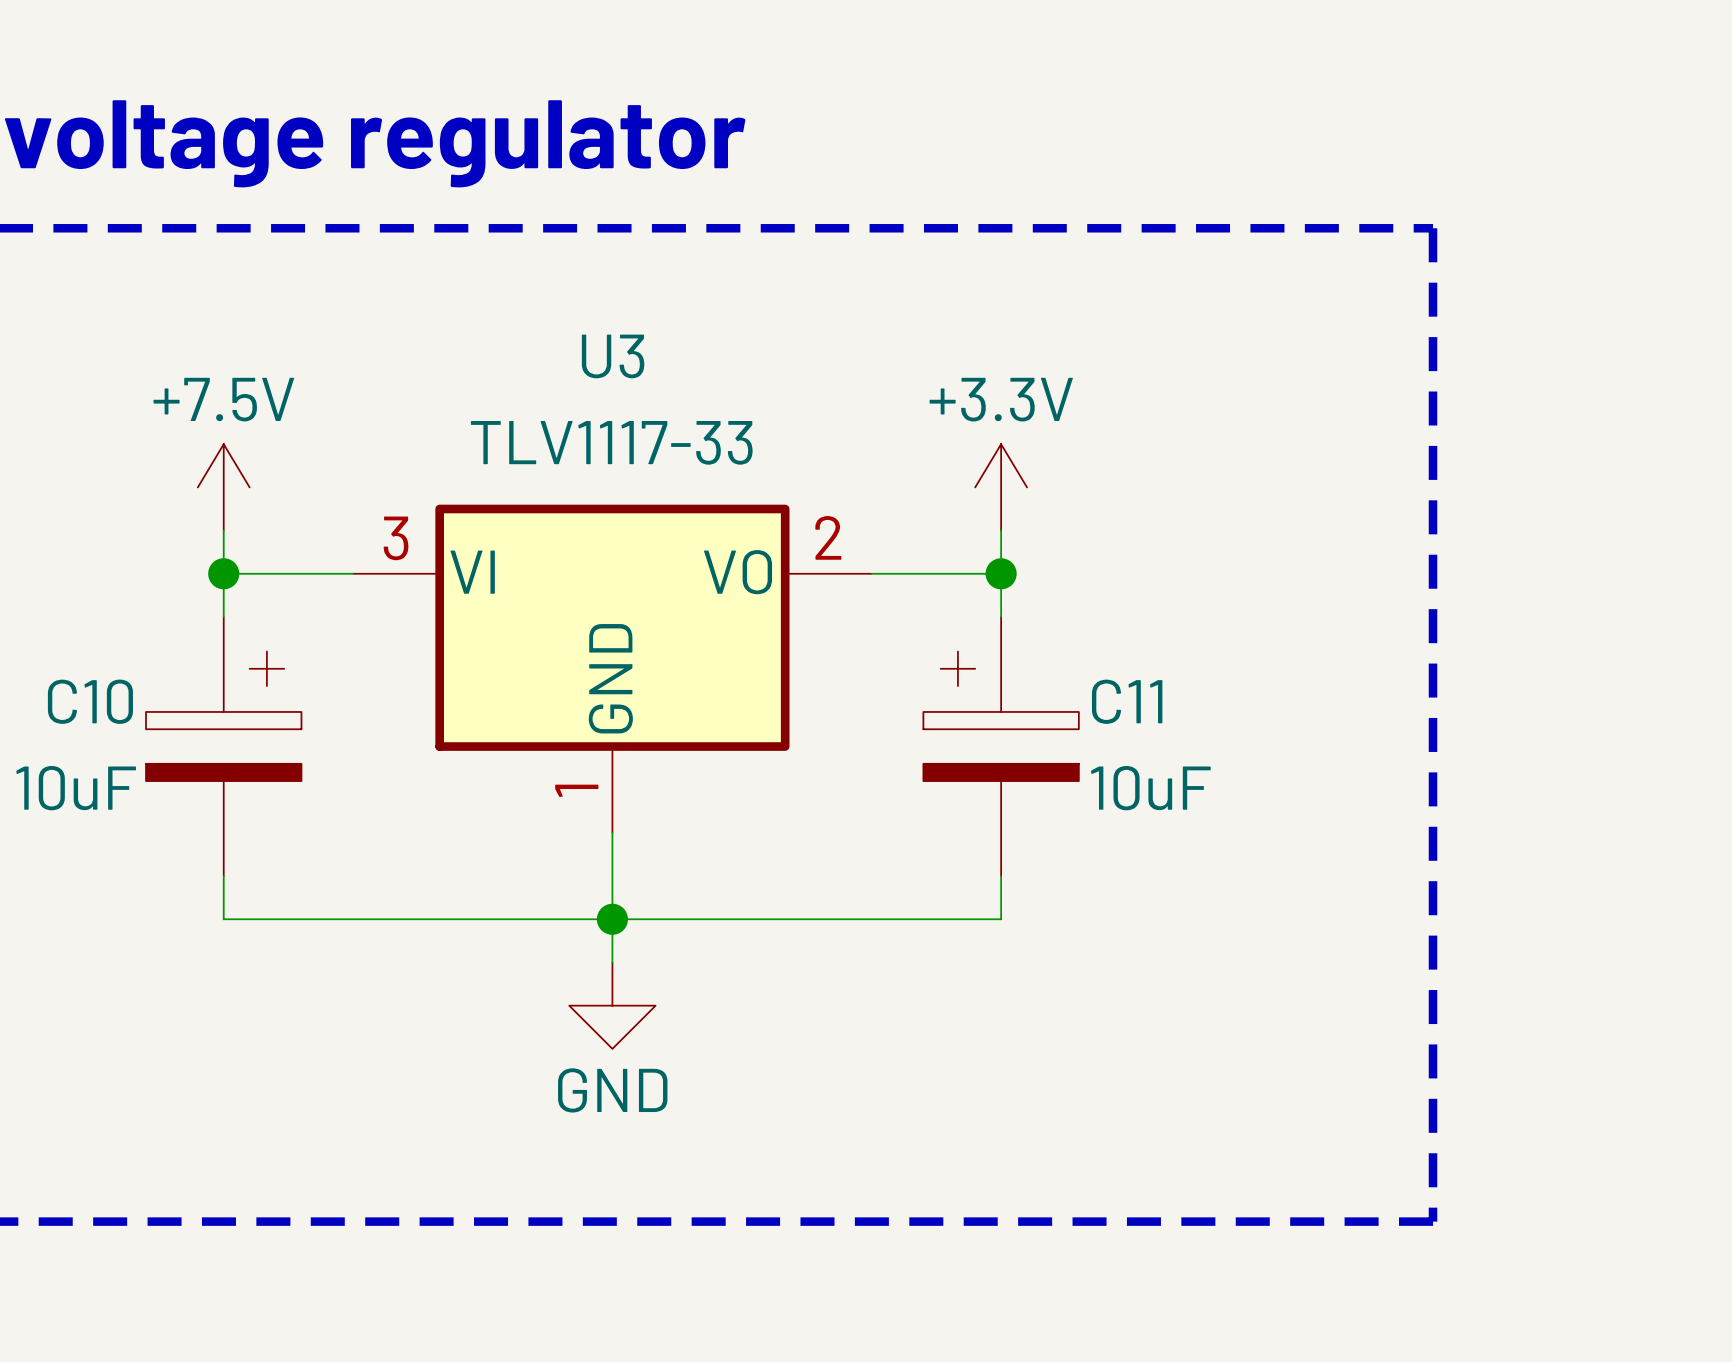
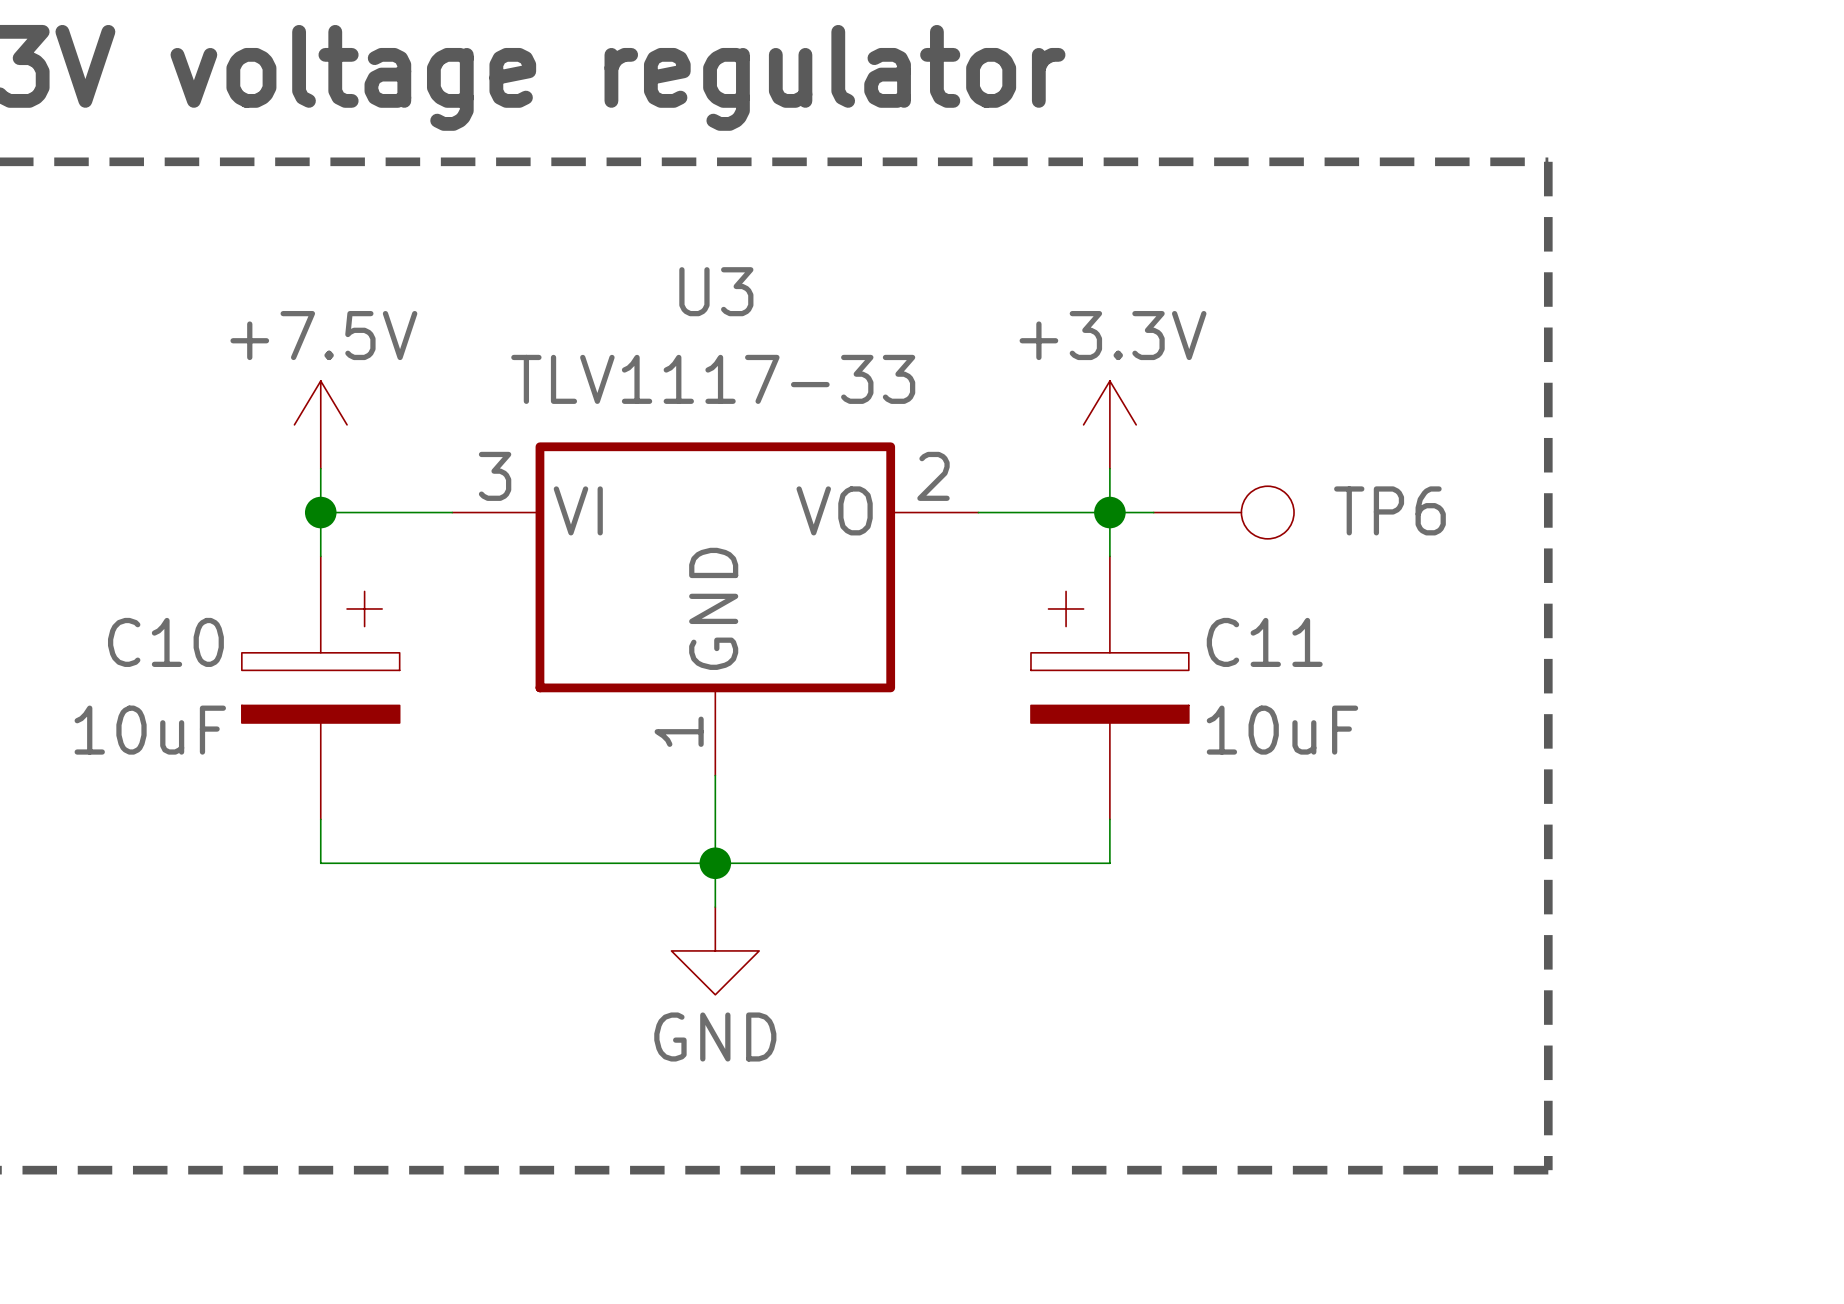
wire: none -> (1109, 512) (1153, 512)
TP6: none -> (1223, 512)

